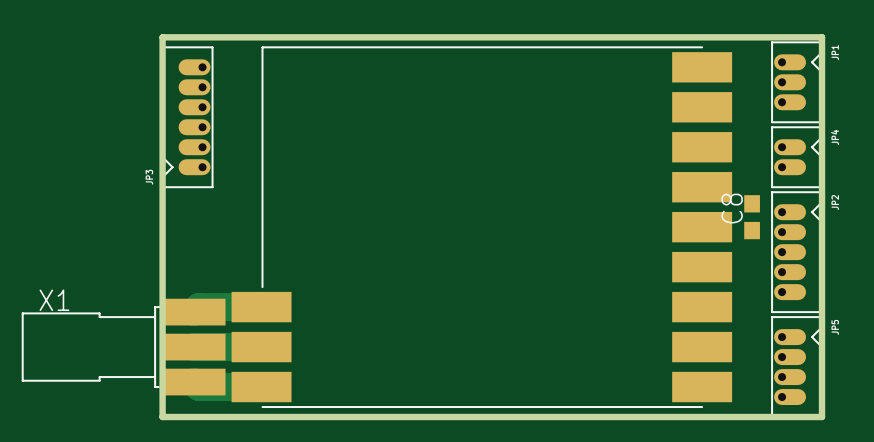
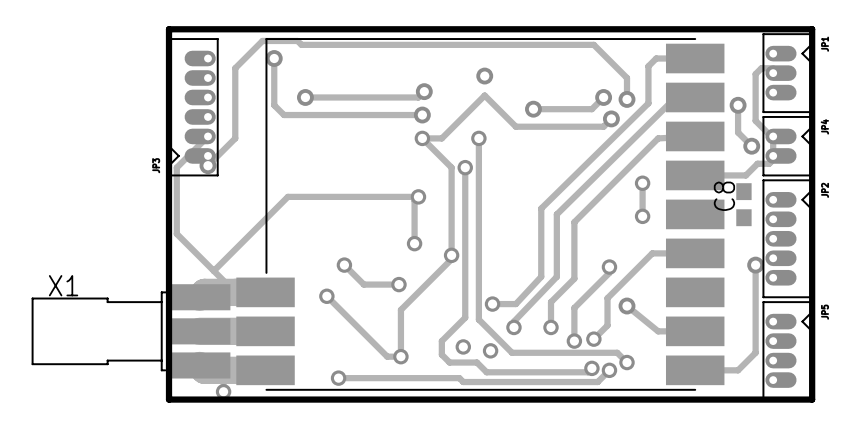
track: none -> (274, 58) (274, 105) (283, 115) (422, 115)
via: none -> (274, 58)
track: none -> (695, 58) (656, 58) (648, 66) (648, 103) (541, 208) (541, 276) (515, 304) (492, 304)
track: none -> (773, 68) (761, 68) (755, 74) (755, 120) (773, 138) (773, 159) (769, 163) (757, 163) (745, 175) (695, 175)
via: none -> (484, 76)
track: none -> (424, 91) (418, 97) (305, 97)
via: none -> (424, 91)
via: none -> (305, 97)
track: none -> (603, 97) (591, 109) (533, 109)
via: none -> (603, 97)
track: none -> (695, 97) (675, 97) (556, 214) (556, 276) (513, 321) (513, 327)
track: none -> (627, 99) (627, 77) (593, 44) (301, 44) (297, 40) (262, 40) (235, 68) (235, 138) (207, 165)
via: none -> (627, 99)
track: none -> (738, 105) (738, 132) (751, 146)
via: none -> (738, 105)
via: none -> (533, 109)
via: none -> (422, 115)
track: none -> (611, 118) (603, 126) (515, 126) (484, 95) (441, 138) (422, 138) (451, 167) (451, 259) (400, 309) (400, 356) (387, 356) (326, 296)
via: none -> (611, 118)
track: none -> (207, 136) (176, 167) (176, 233) (235, 292)
track: none -> (695, 136) (658, 138) (574, 222) (574, 278) (551, 302) (551, 327)
via: none -> (422, 138)
track: none -> (478, 138) (478, 319) (512, 352) (617, 352) (627, 362)
via: none -> (478, 138)
via: none -> (751, 146)
via: none -> (207, 165)
track: none -> (465, 167) (465, 317) (441, 341) (441, 354) (449, 362) (476, 362) (486, 372) (588, 372) (591, 368)
via: none -> (465, 167)
track: none -> (642, 183) (642, 216)
via: none -> (642, 183)
via: none -> (418, 196)
via: none -> (642, 216)
track: none -> (414, 243) (414, 200) (418, 196) (287, 196) (213, 270)
via: none -> (414, 243)
track: none -> (695, 253) (652, 253) (607, 298) (607, 325) (593, 339)
via: none -> (451, 255)
track: none -> (344, 265) (363, 284) (398, 284)
via: none -> (344, 265)
track: none -> (755, 265) (755, 352) (738, 370) (695, 370)
via: none -> (755, 265)
track: none -> (609, 267) (609, 272) (574, 307) (574, 341)
via: none -> (609, 267)
via: none -> (398, 284)
via: none -> (326, 296)
via: none -> (492, 304)
track: none -> (627, 306) (658, 331) (695, 331)
via: none -> (627, 306)
via: none -> (513, 327)
via: none -> (551, 327)
via: none -> (593, 339)
via: none -> (574, 341)
via: none -> (463, 346)
via: none -> (490, 350)
via: none -> (400, 356)
via: none -> (627, 362)
via: none -> (591, 368)
track: none -> (609, 370) (597, 382) (463, 382) (459, 378) (338, 378)
via: none -> (609, 370)
via: none -> (338, 378)
via: none -> (223, 391)

